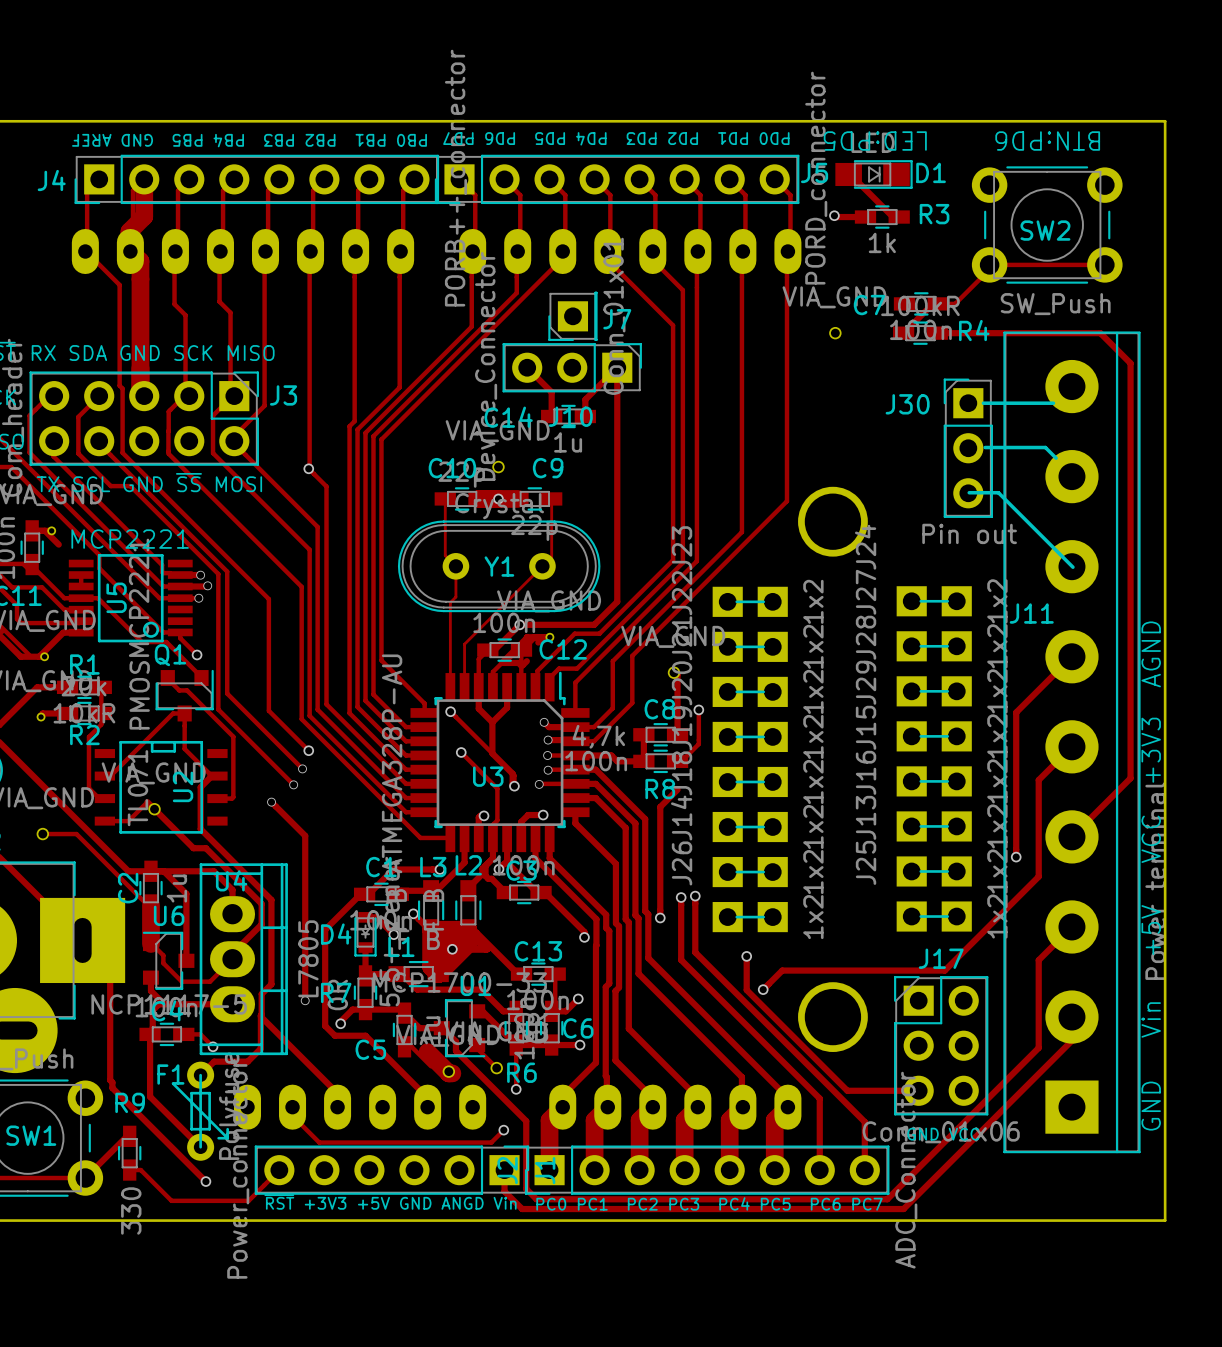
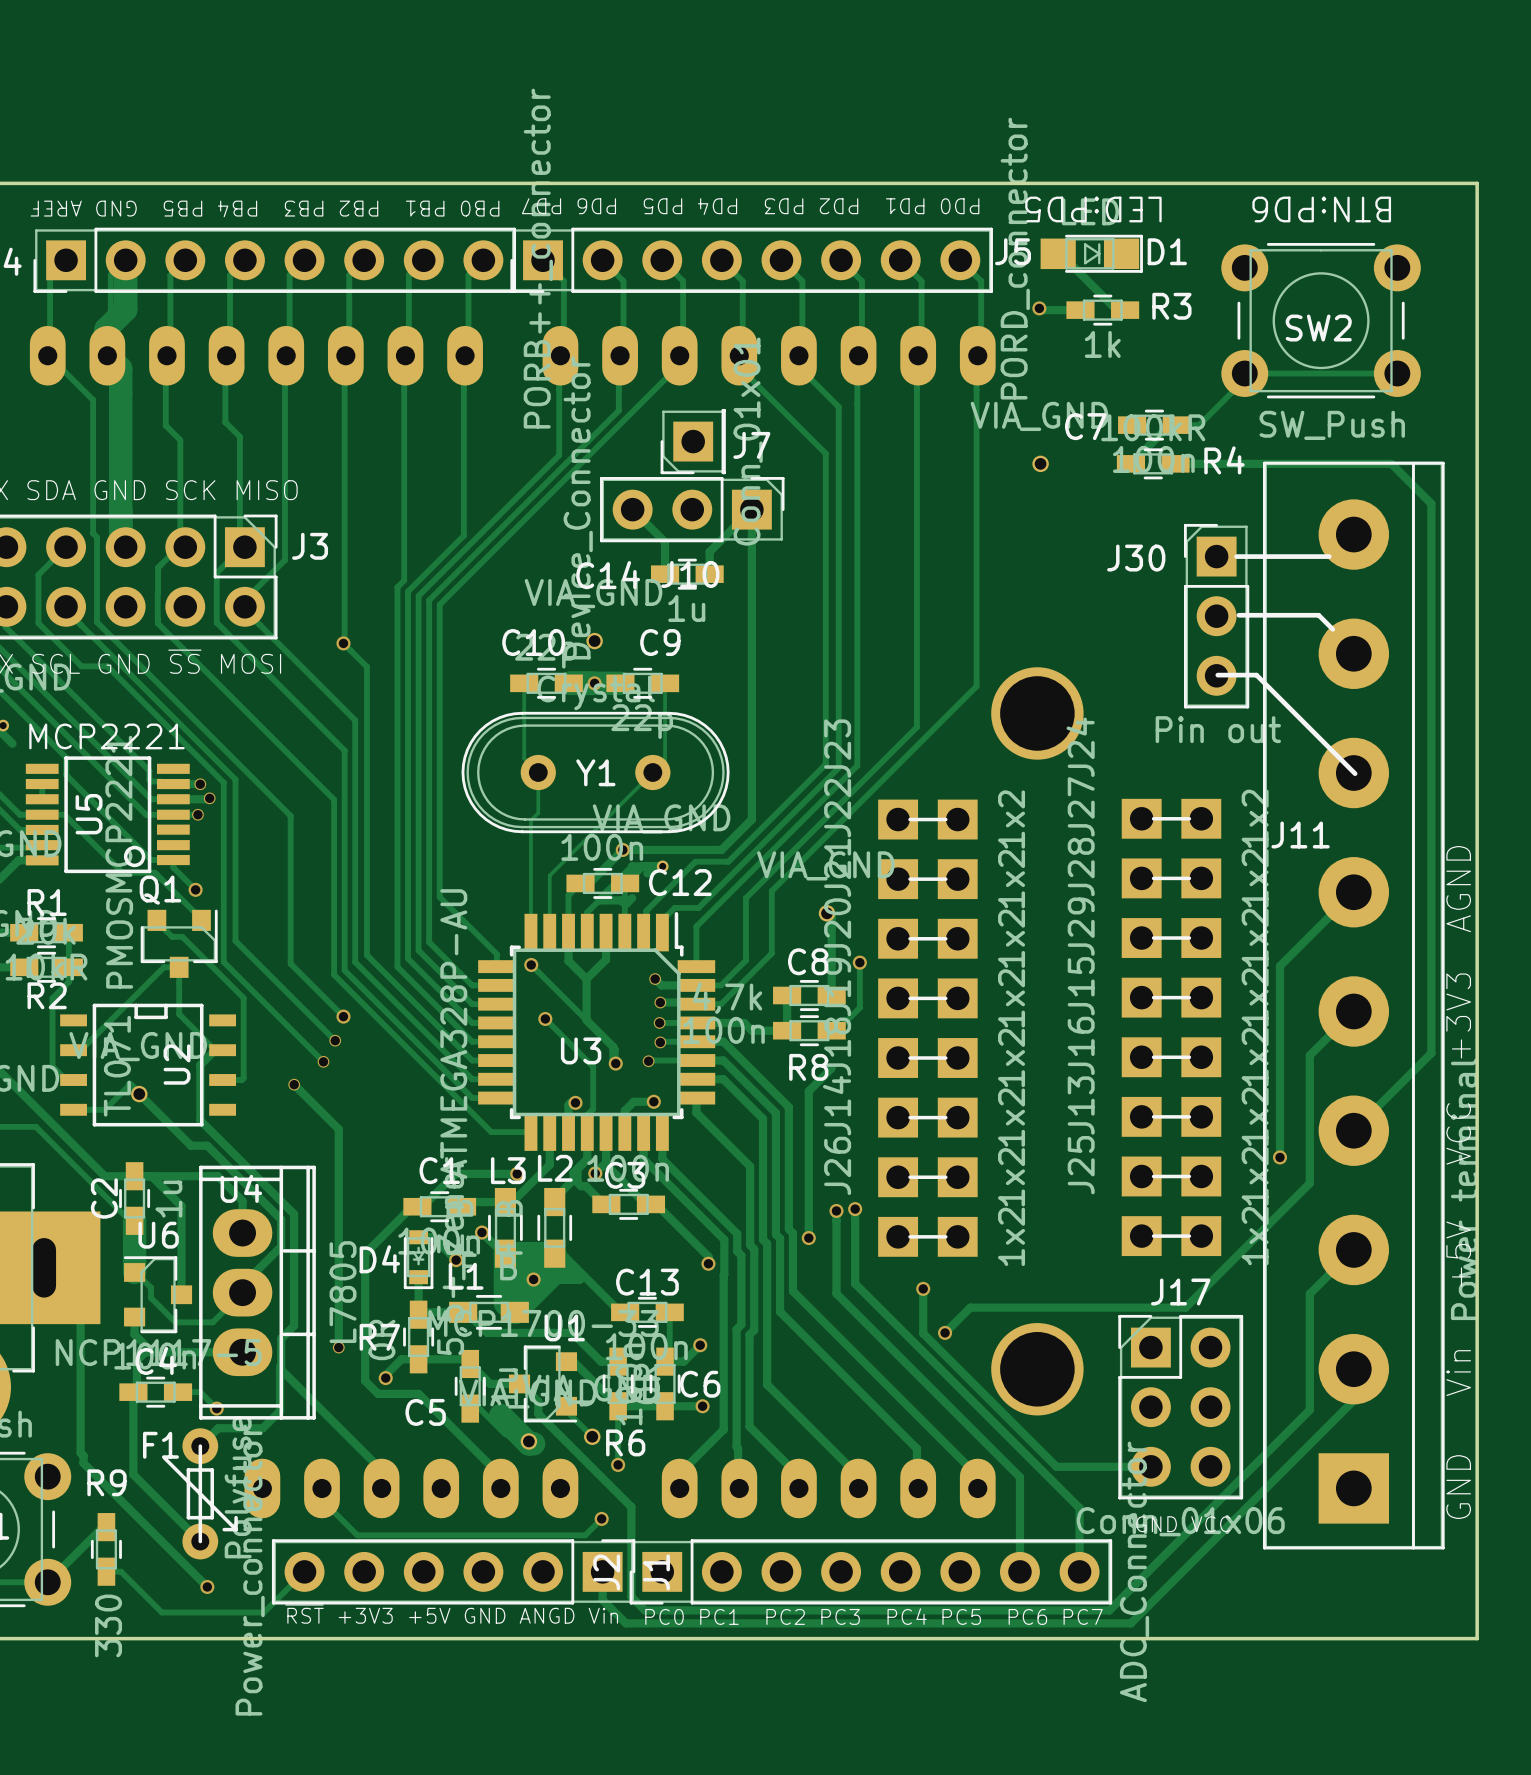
track: (607, 1107) (594, 1120) (594, 1170) -> none
track: (652, 1107) (639, 1120) (639, 1170) -> none
track: (697, 1107) (684, 1120) (684, 1170) -> none
track: (742, 1107) (729, 1120) (729, 1170) -> none
track: (787, 1107) (774, 1120) (774, 1170) -> none
track: (562, 1111) (562, 1107) (549, 1120) (549, 1170) -> none

